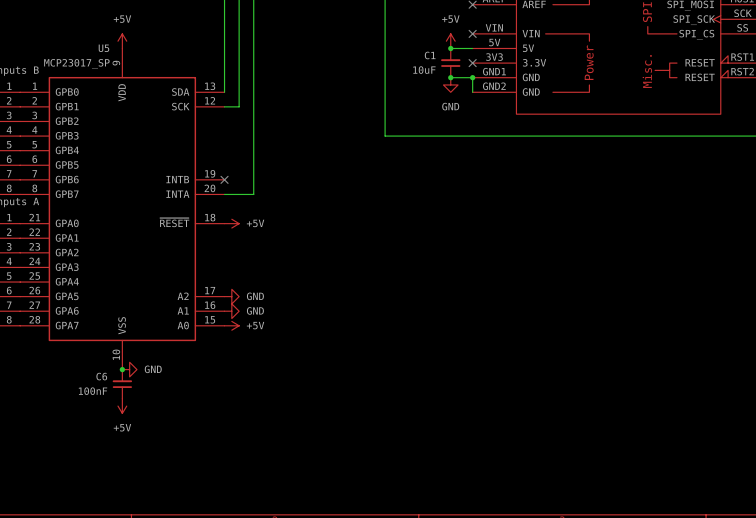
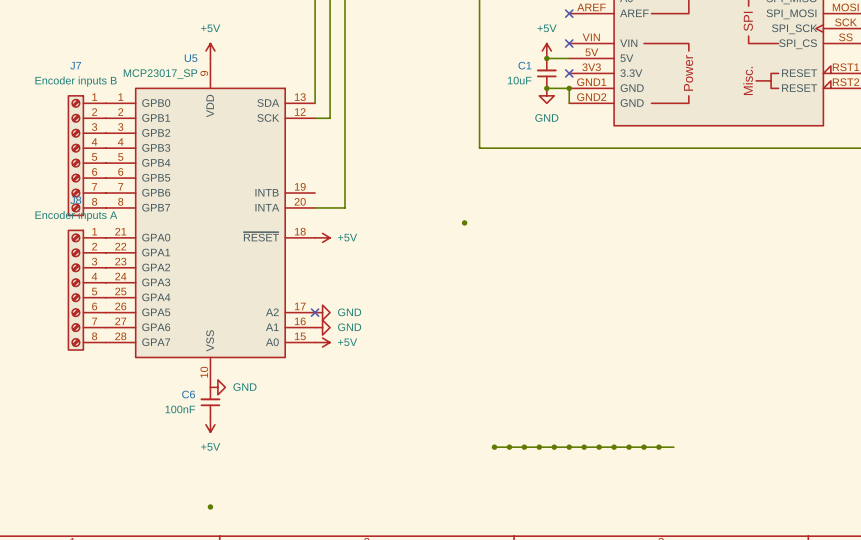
no-connect mark: (224, 179) -> none
junction: none -> (464, 222)
no-connect mark: none -> (315, 312)
junction: (122, 369) -> none
wire: none -> (494, 447) (673, 447)
junction: none -> (494, 447)
junction: none -> (509, 447)
junction: none -> (524, 447)
junction: none -> (539, 447)
junction: none -> (554, 447)
junction: none -> (569, 447)
junction: none -> (584, 447)
junction: none -> (599, 447)
junction: none -> (614, 447)
junction: none -> (629, 447)
junction: none -> (643, 447)
junction: none -> (658, 447)
junction: none -> (210, 506)

